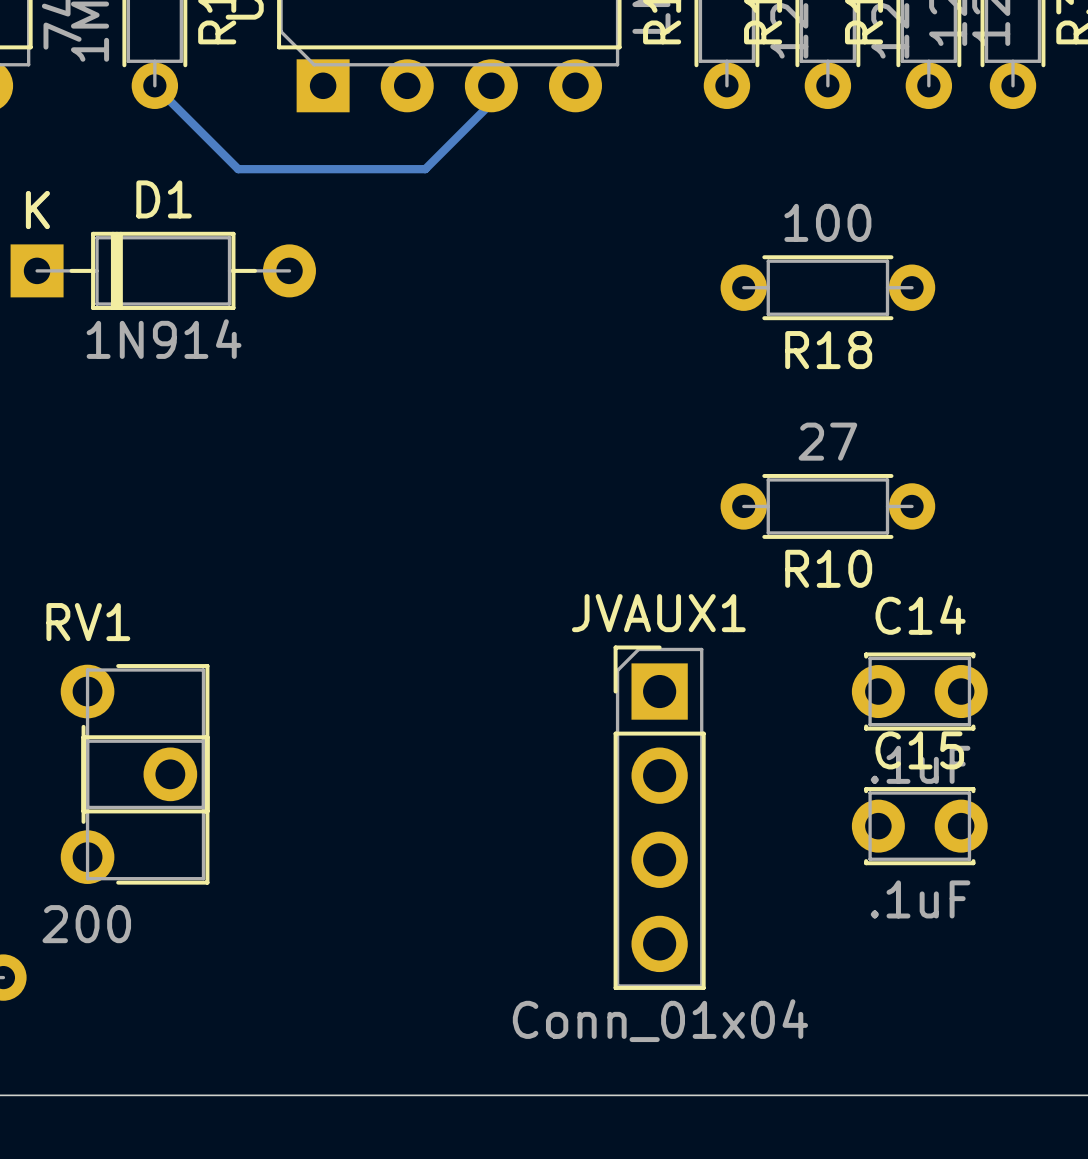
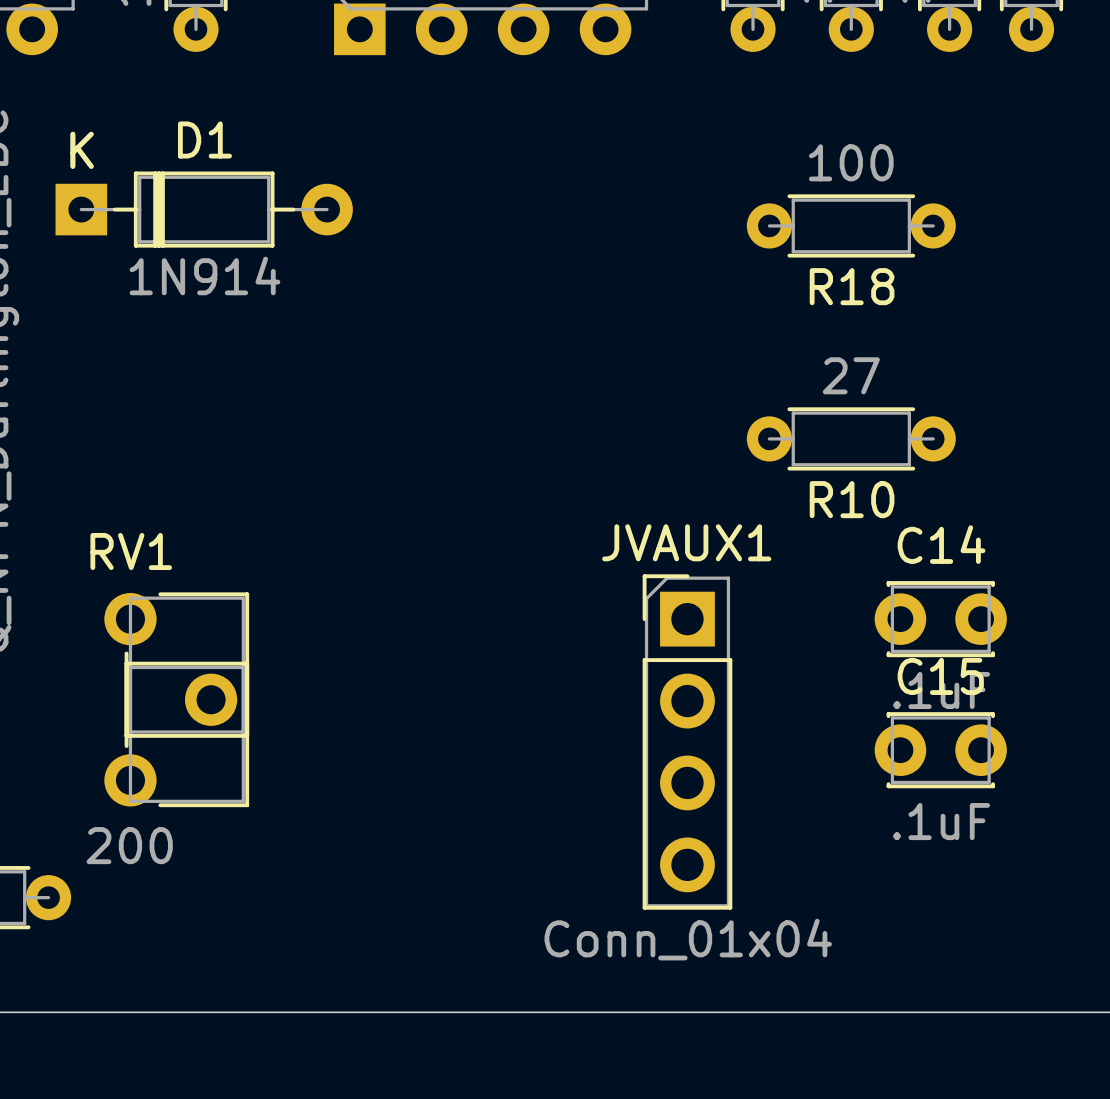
bottom track: (154, 85) (238, 169) (425, 169) (491, 103) (491, 85) -> none

